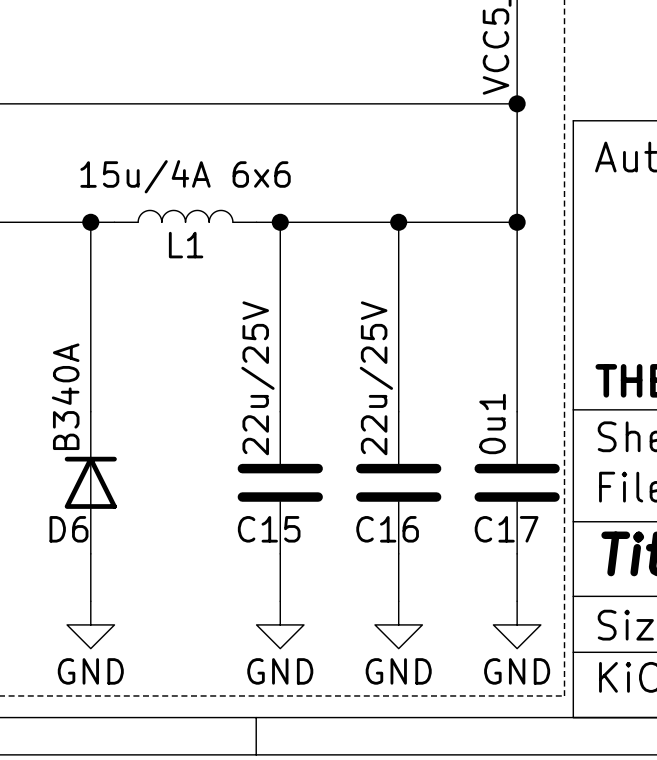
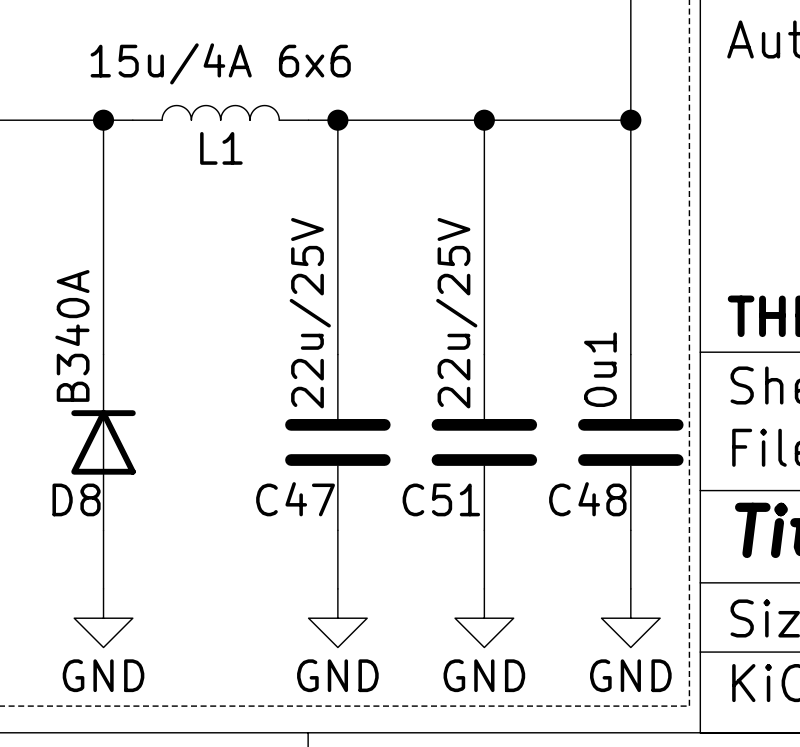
D6 name: D6 (68, 529) -> D8 (76, 499)
C15 name: C15 (269, 529) -> C47 (295, 499)
C16 name: C16 (387, 529) -> C51 (441, 499)
C17 name: C17 (506, 529) -> C48 (587, 499)

